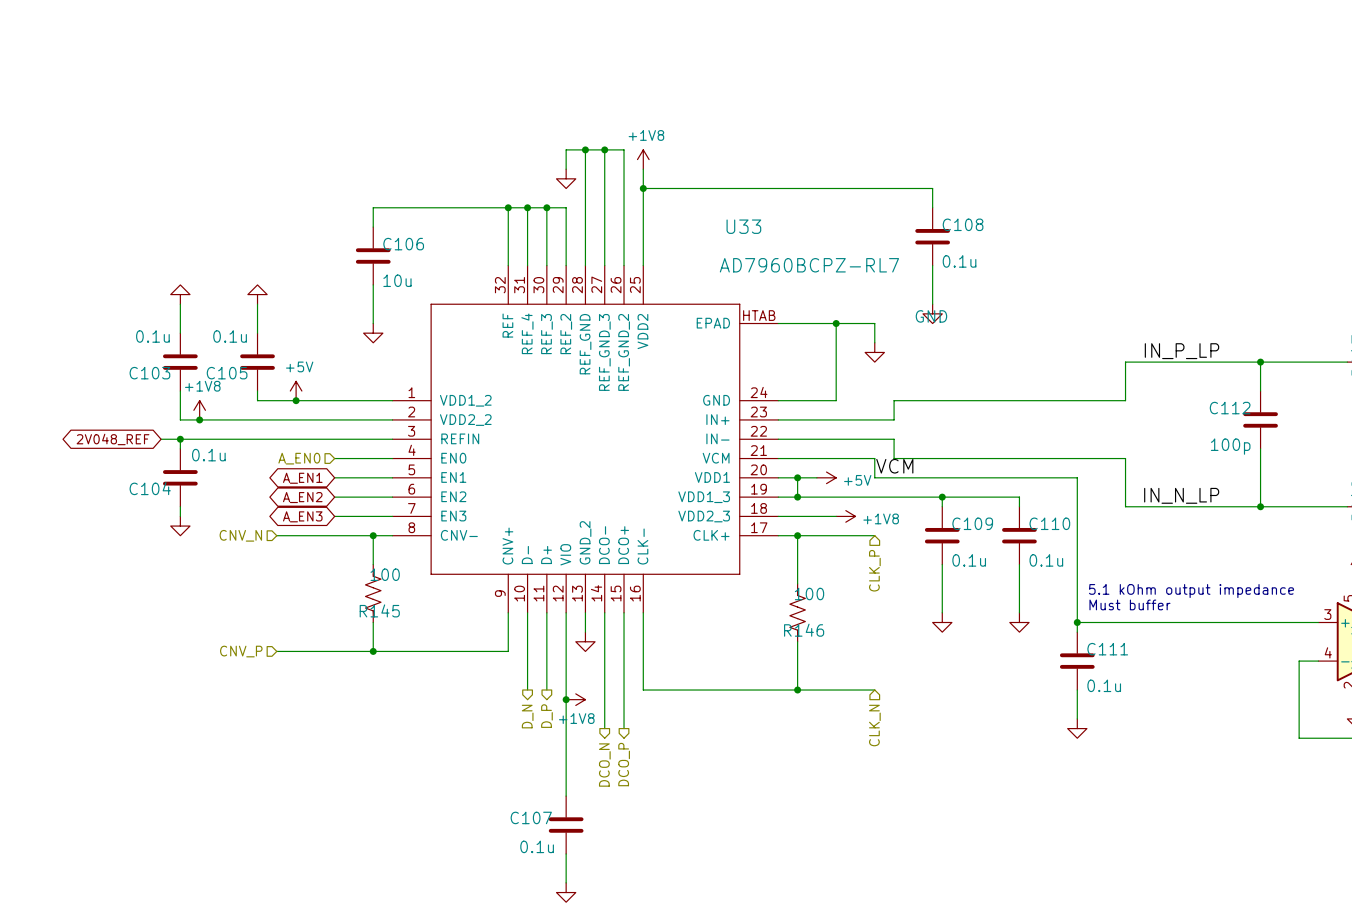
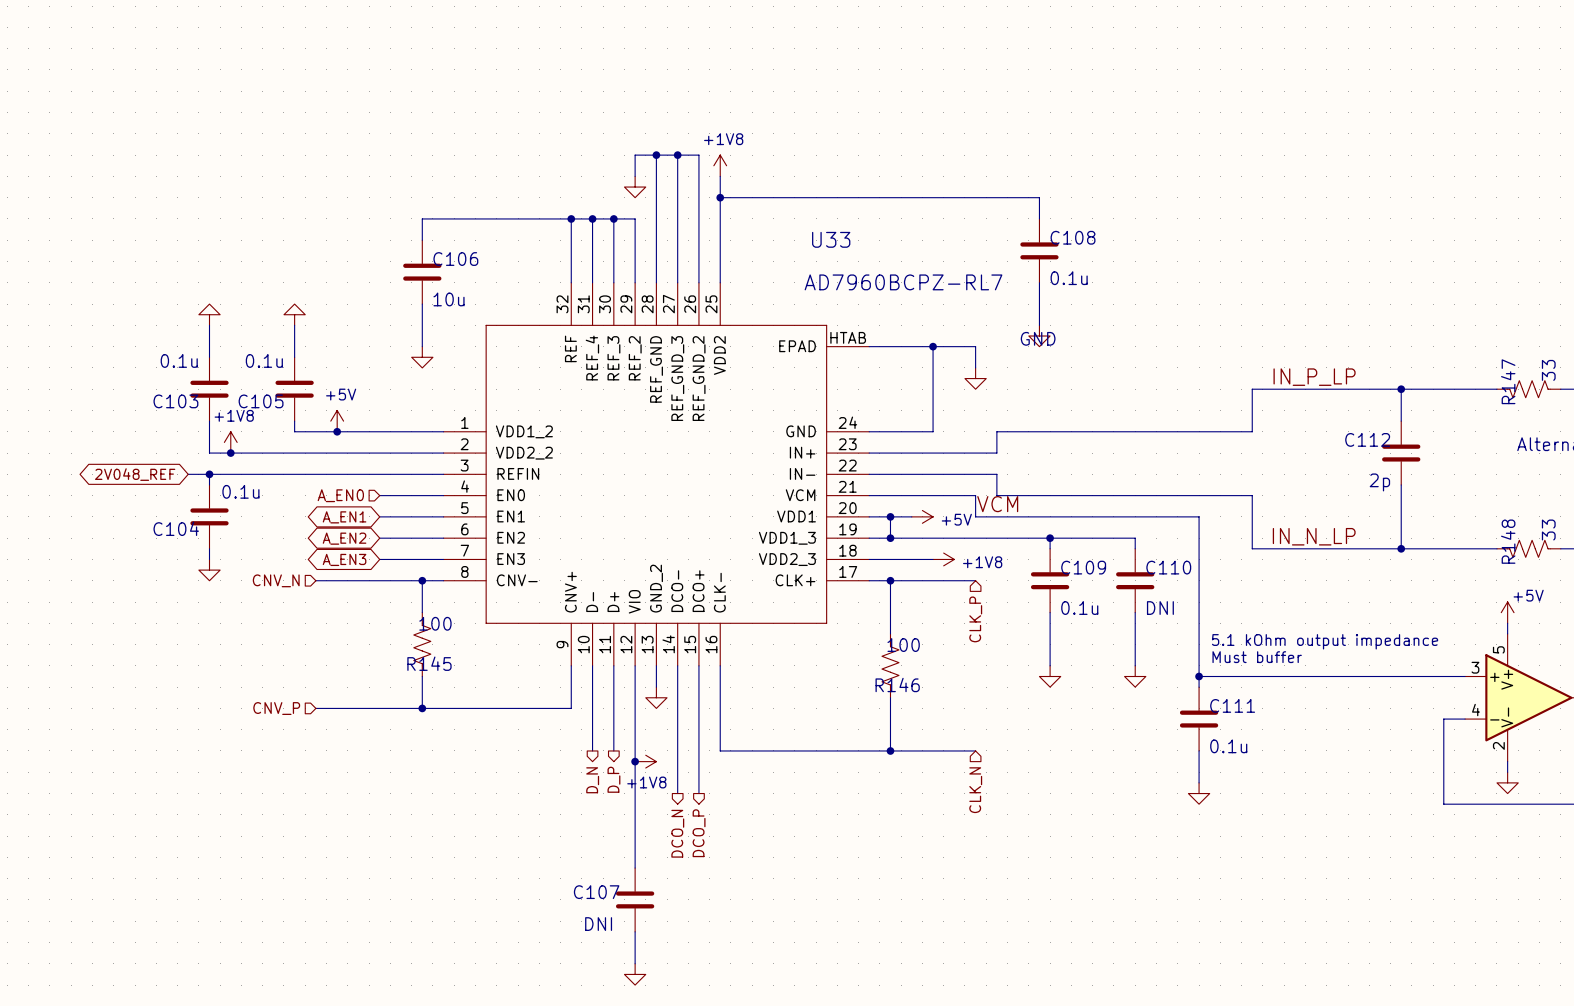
C112 value: 100p (1230, 446) -> 2p (1379, 482)
C110 value: 0.1u (1046, 560) -> DNI (1160, 608)
C107 value: 0.1u (537, 846) -> DNI (598, 924)

